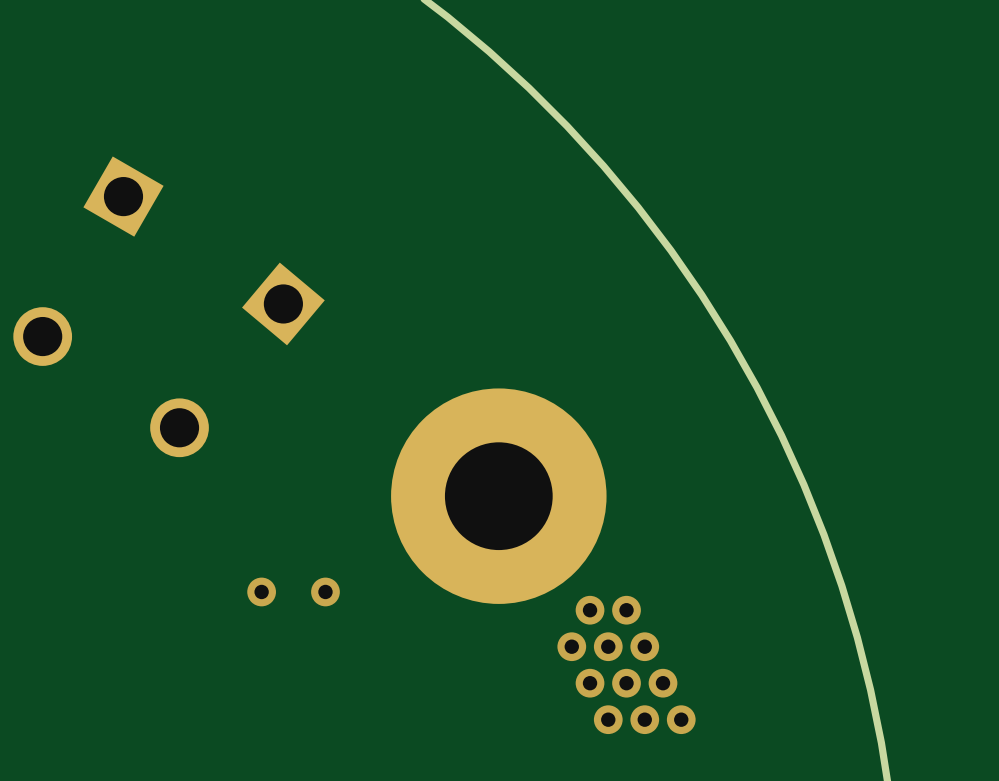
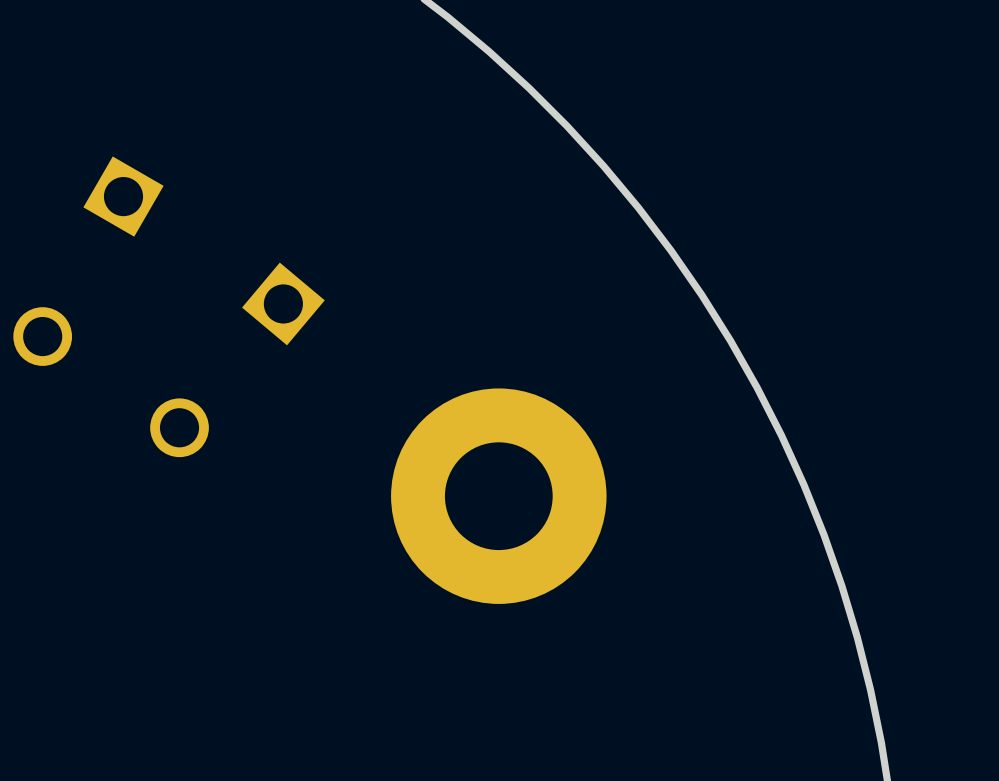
via: (261, 591) -> none
via: (325, 591) -> none
via: (590, 610) -> none
via: (626, 610) -> none
via: (571, 646) -> none
via: (608, 646) -> none
via: (644, 646) -> none
via: (590, 683) -> none
via: (626, 683) -> none
via: (663, 683) -> none
via: (608, 719) -> none
via: (644, 719) -> none
via: (681, 719) -> none

